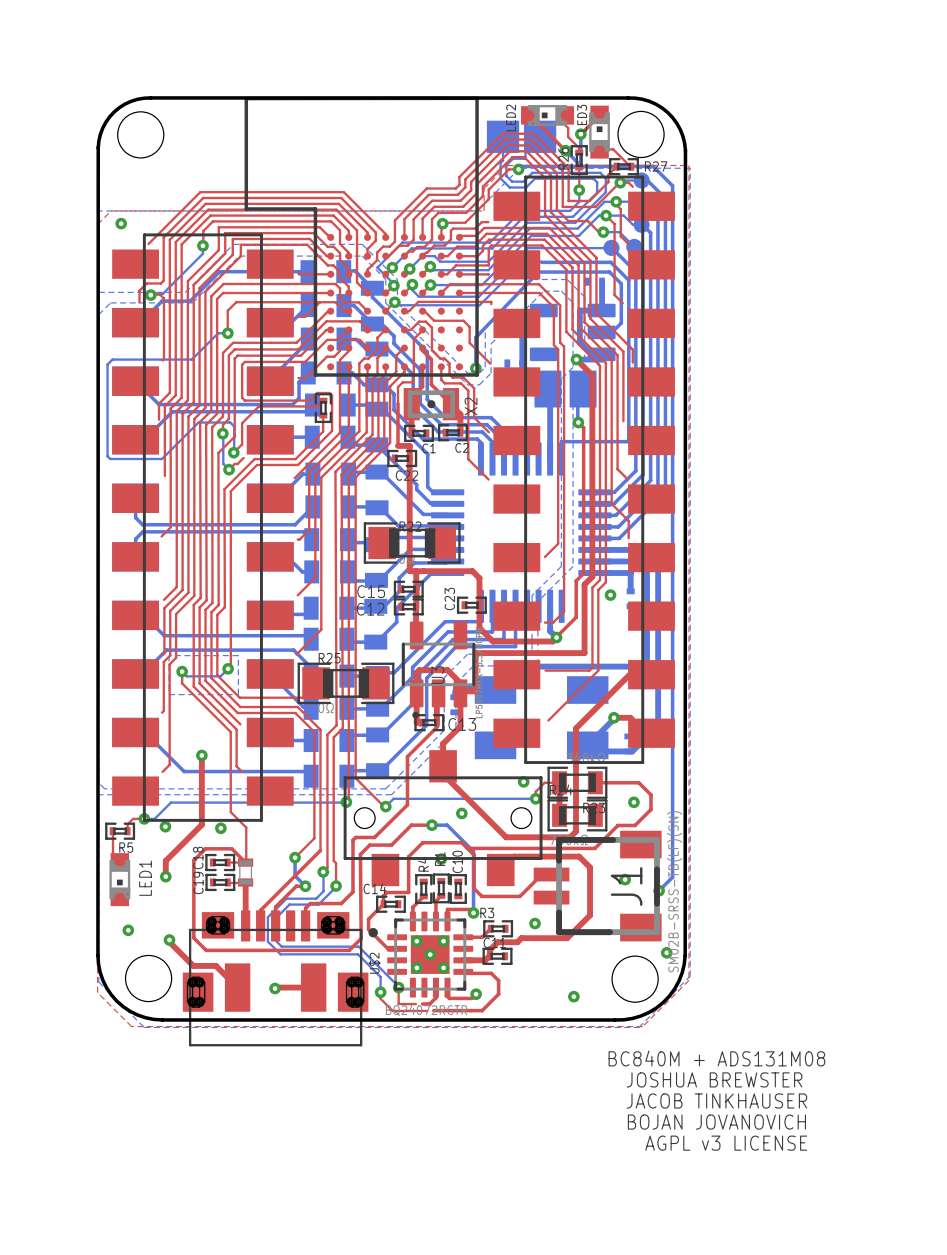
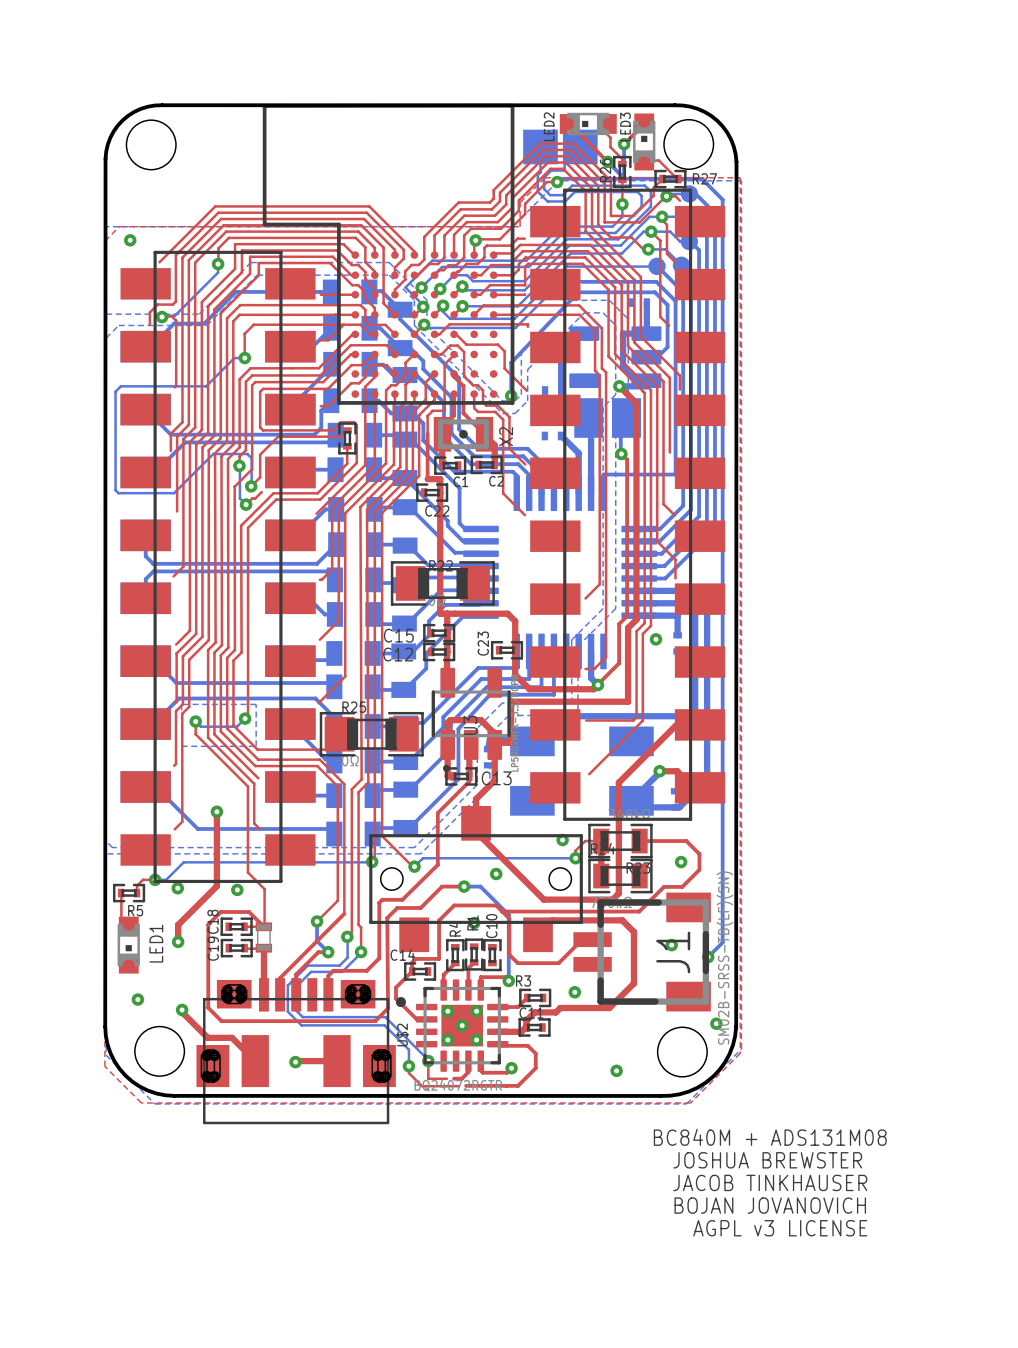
part: none -> (552, 435)
bottom track: none -> (560, 435) (578, 453) (578, 493)

